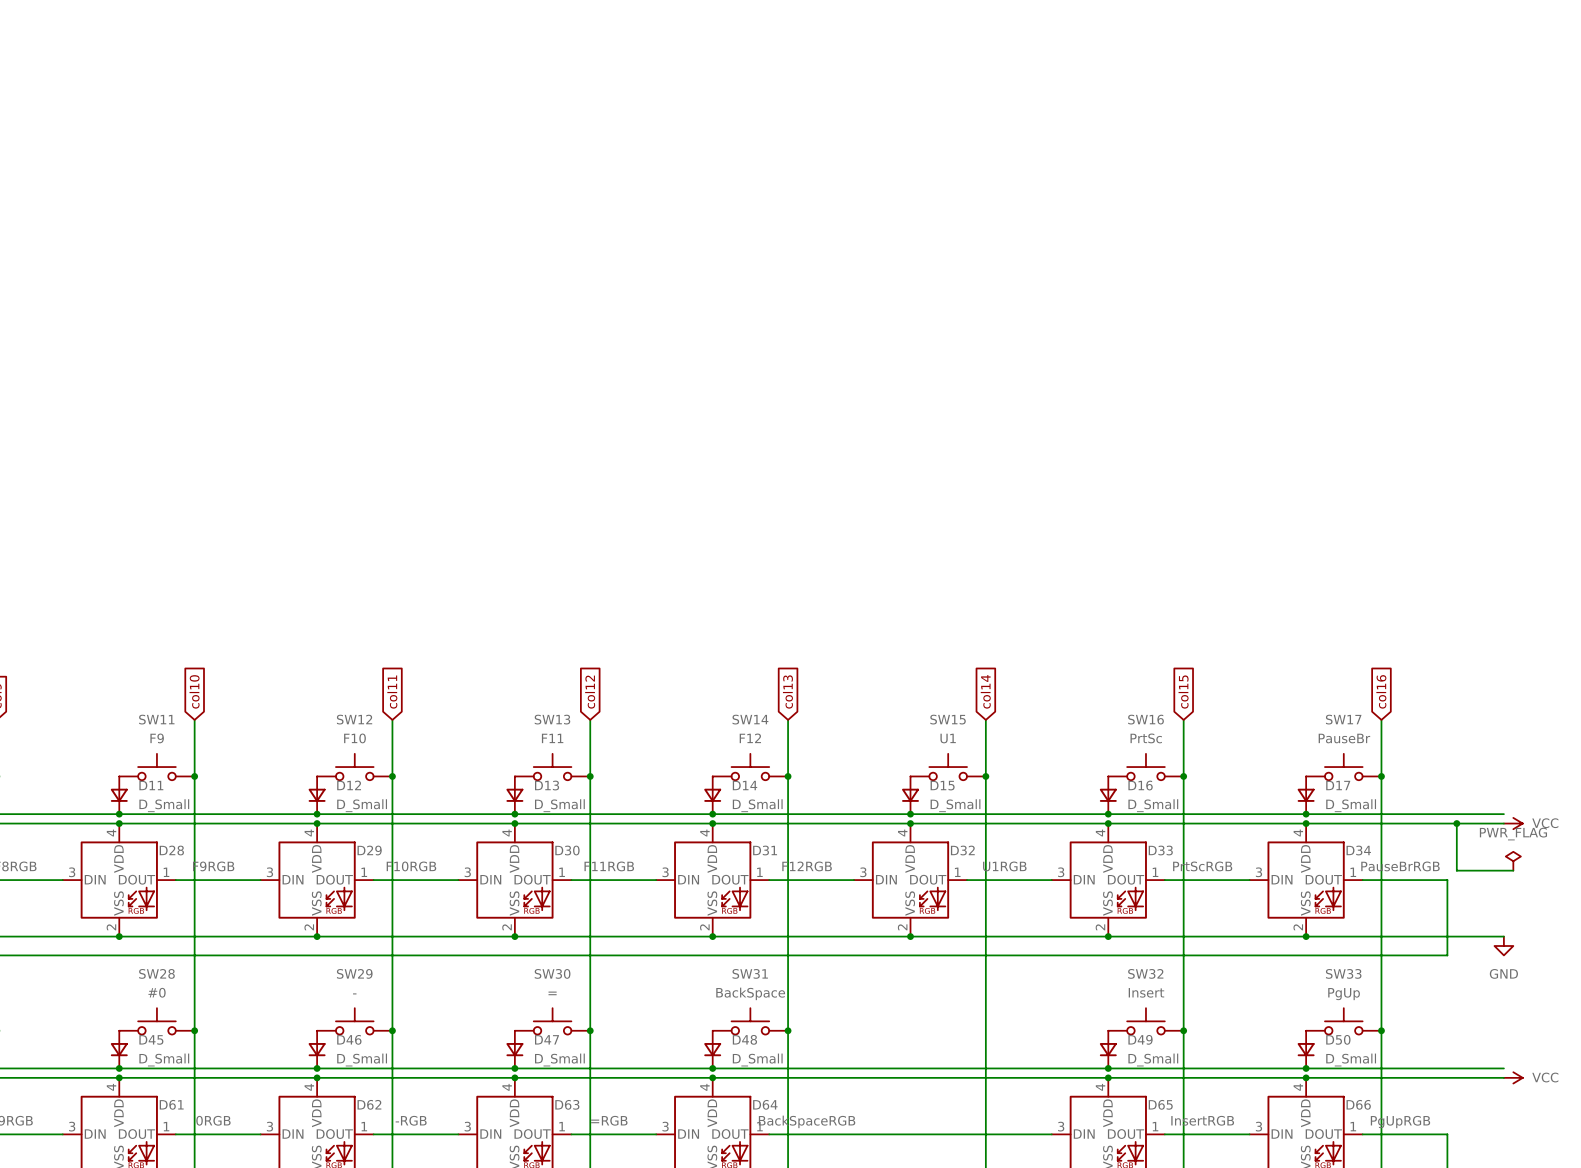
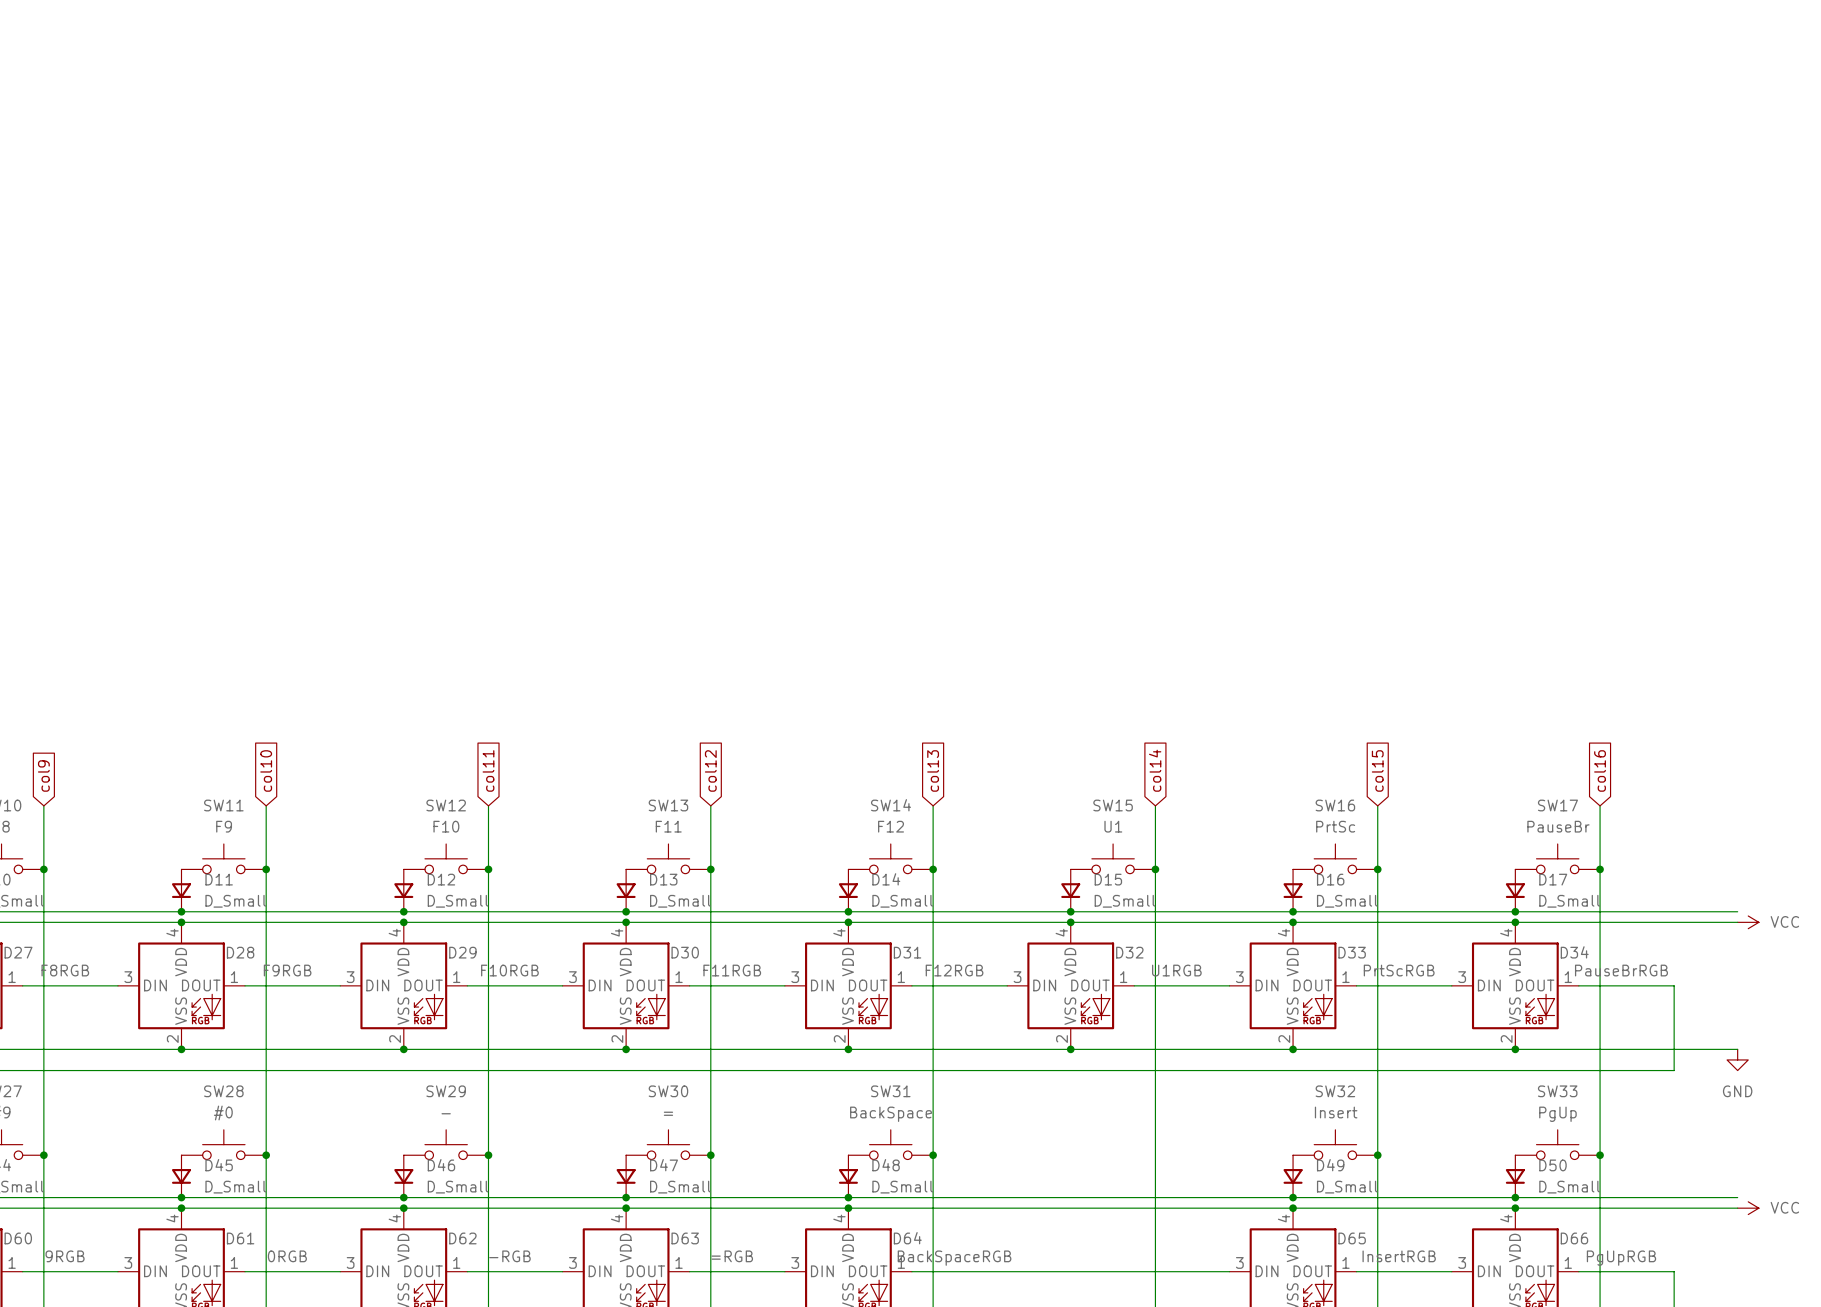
wire: (1456, 823) (1456, 870) (1513, 870) -> none
junction: (1456, 823) -> none
power symbol: PWR_FLAG (1513, 861) -> none

